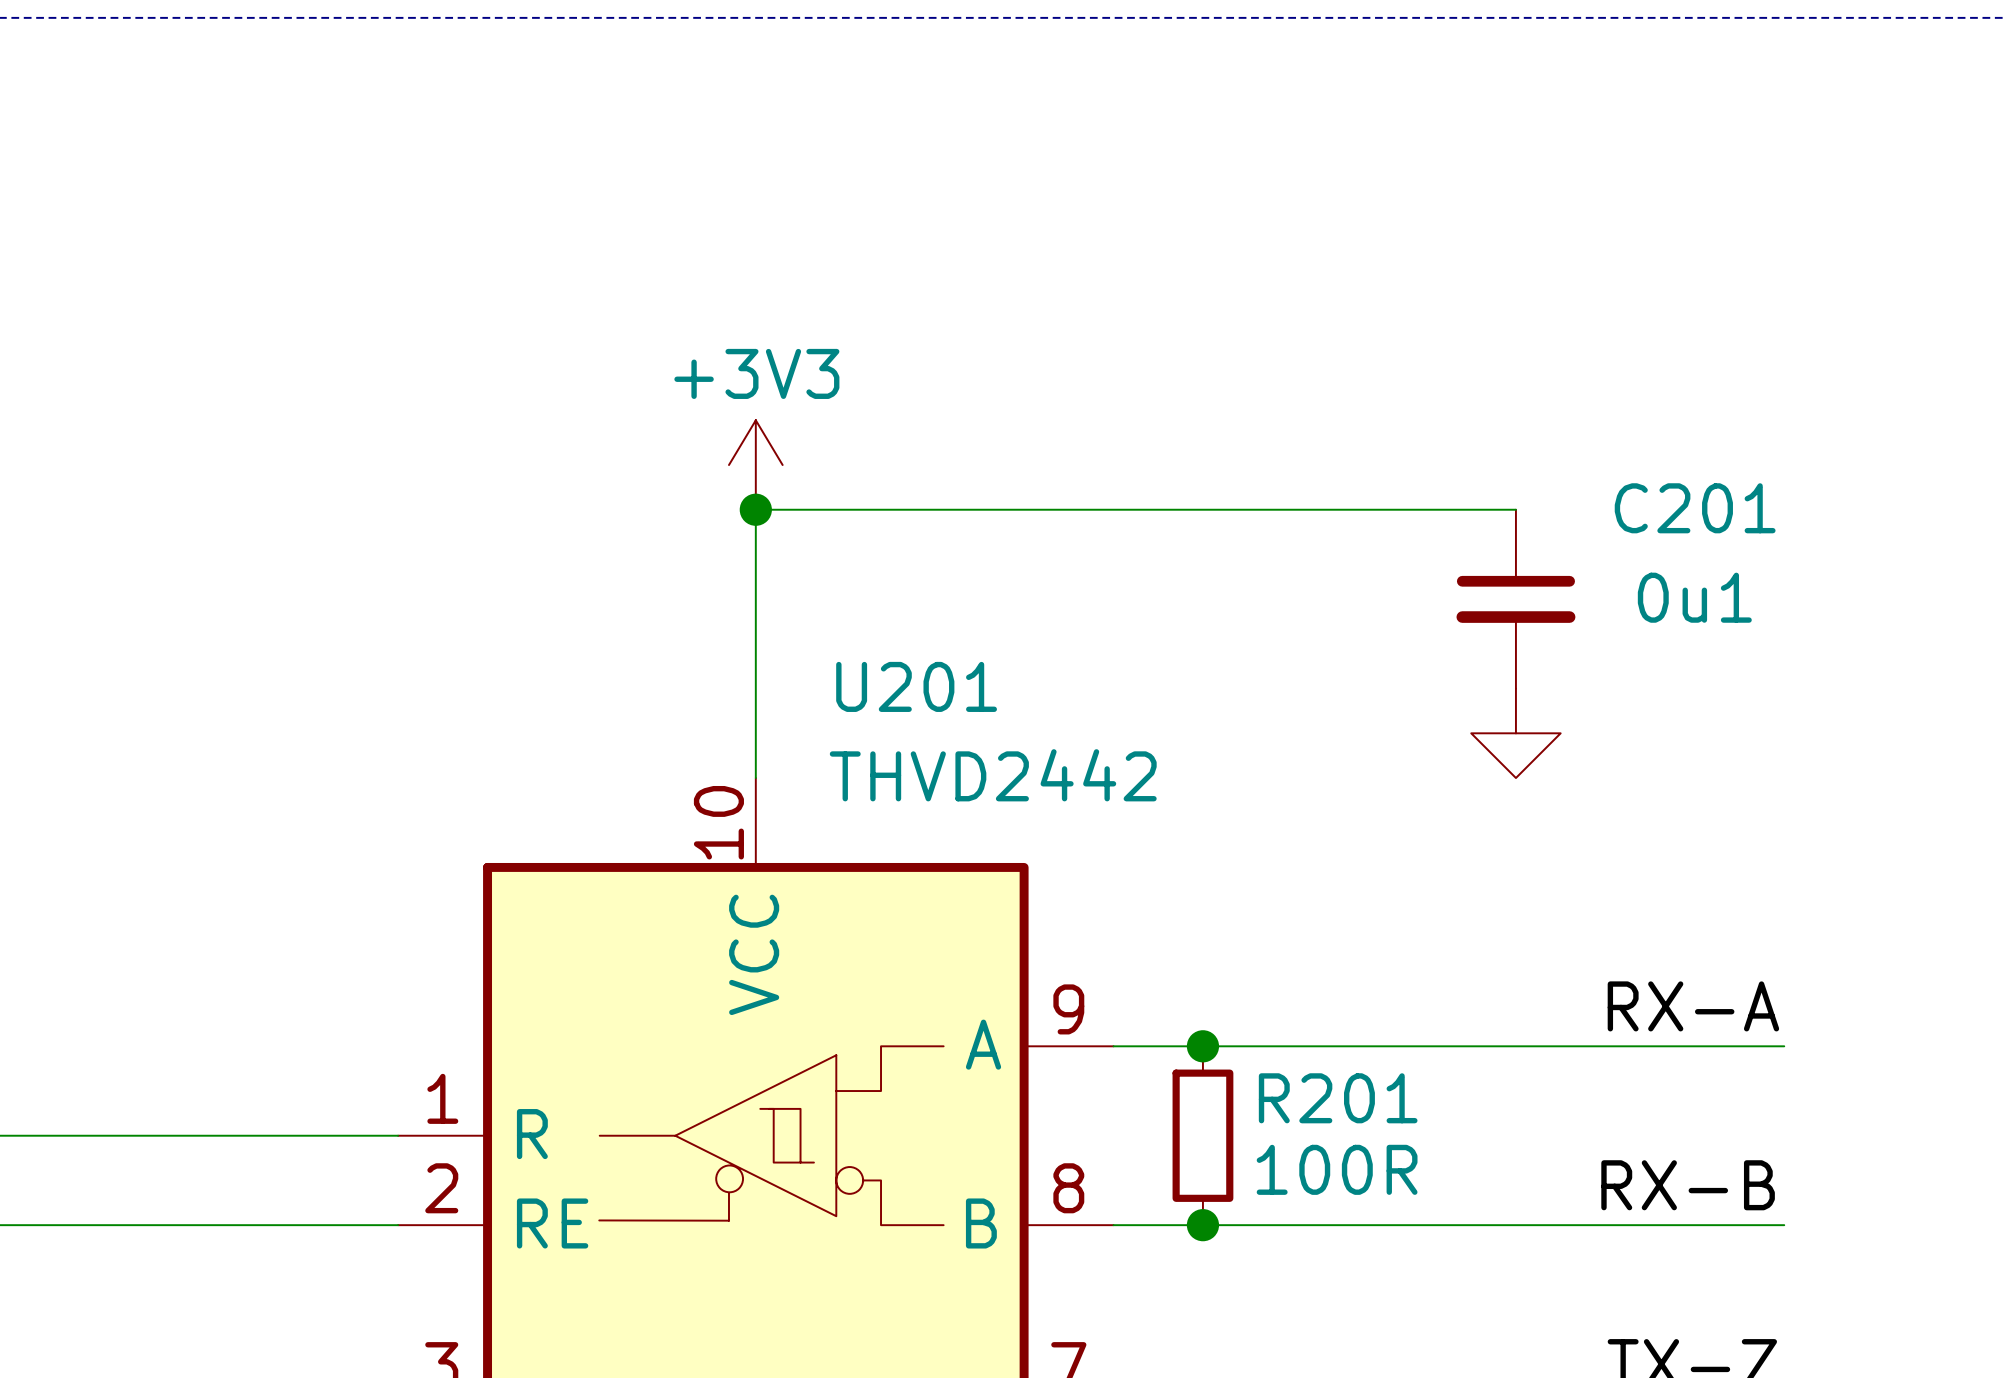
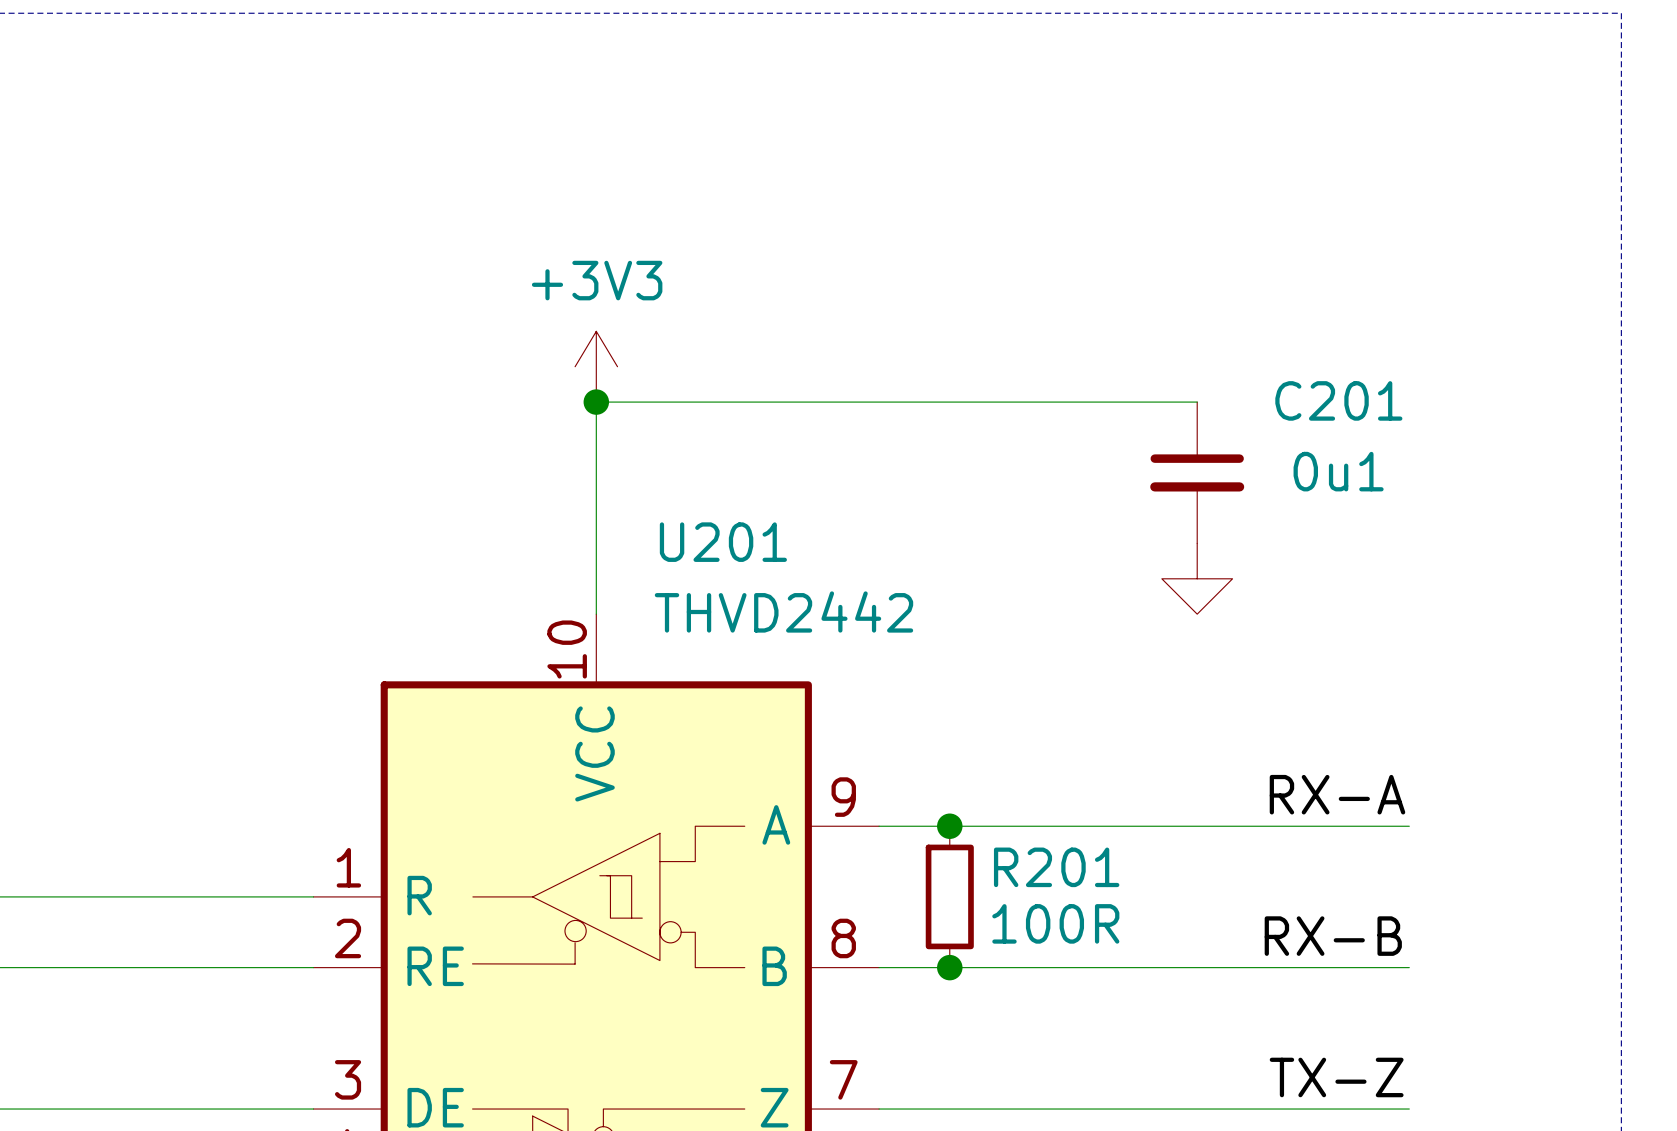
power symbol text position: +3V3 (756, 373) -> +3V3 (597, 280)

